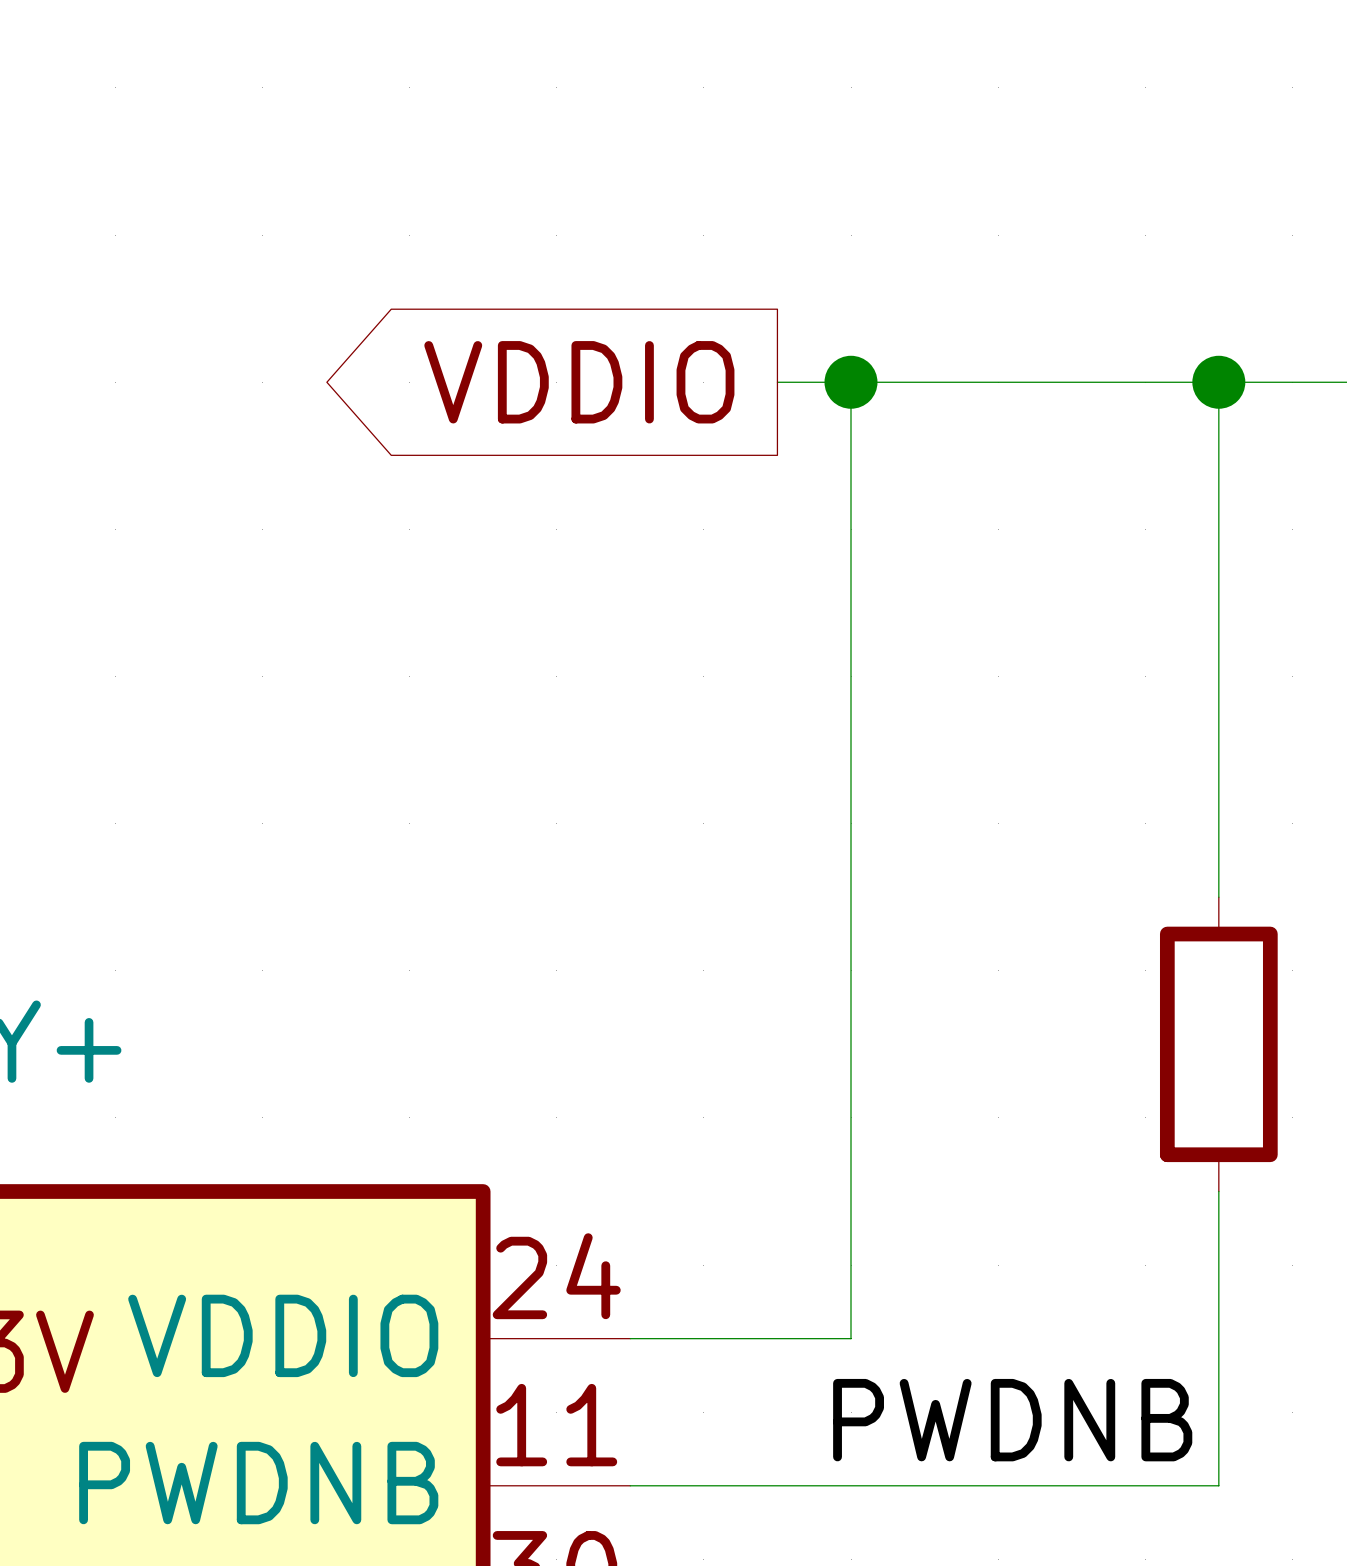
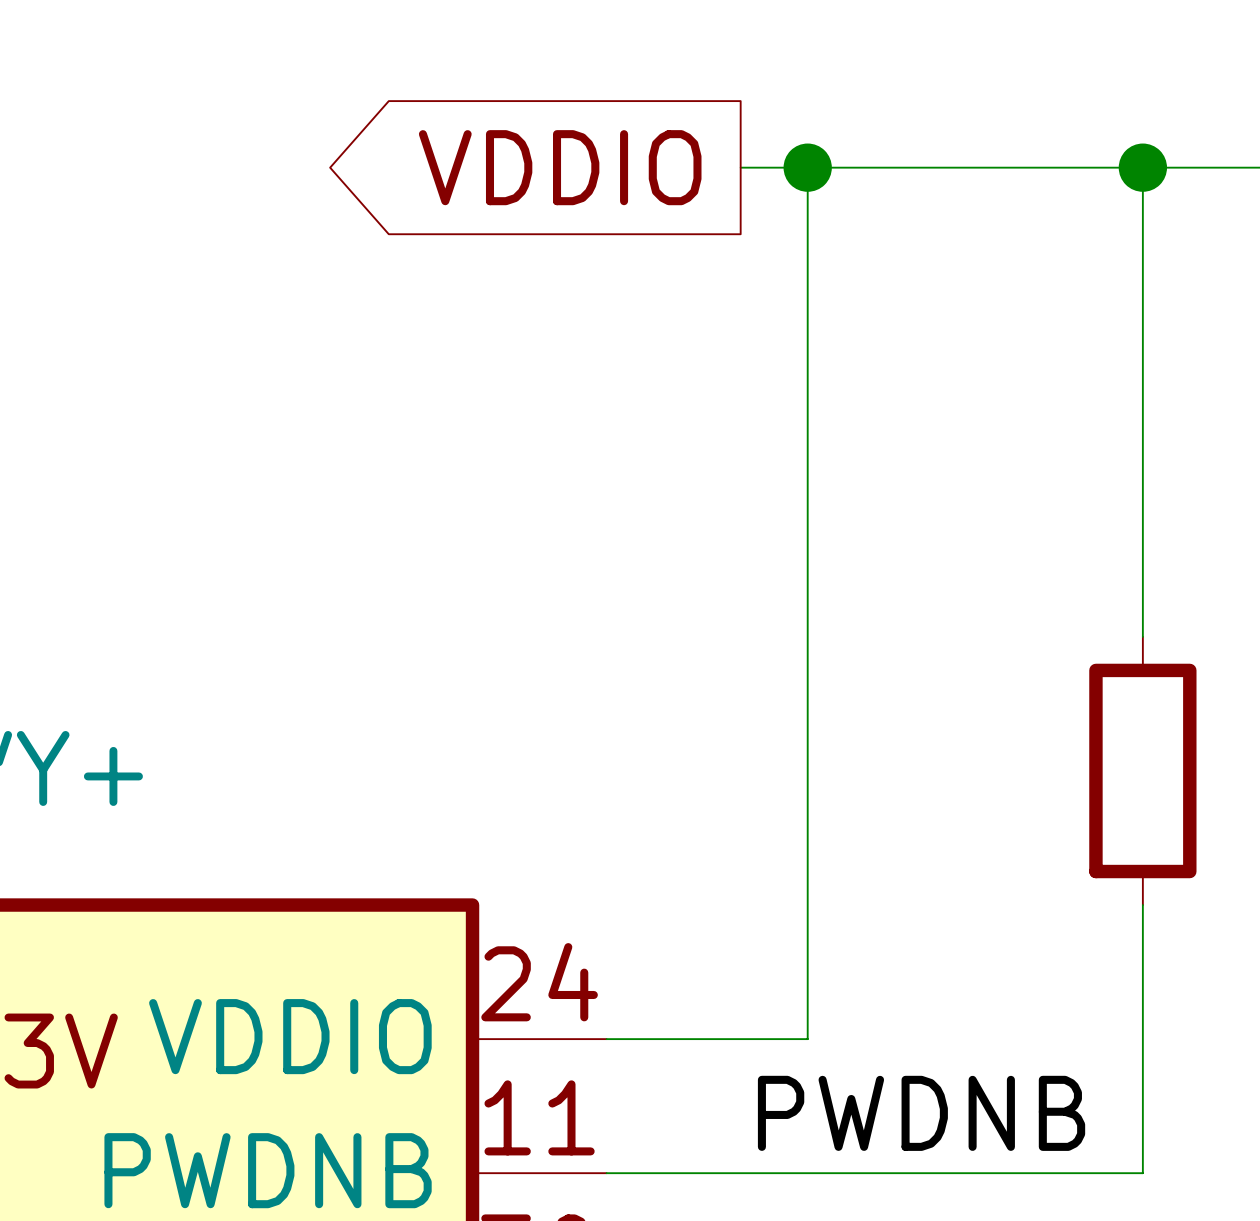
label position: PWDNB (1012, 1420) -> PWDNB (921, 1113)

